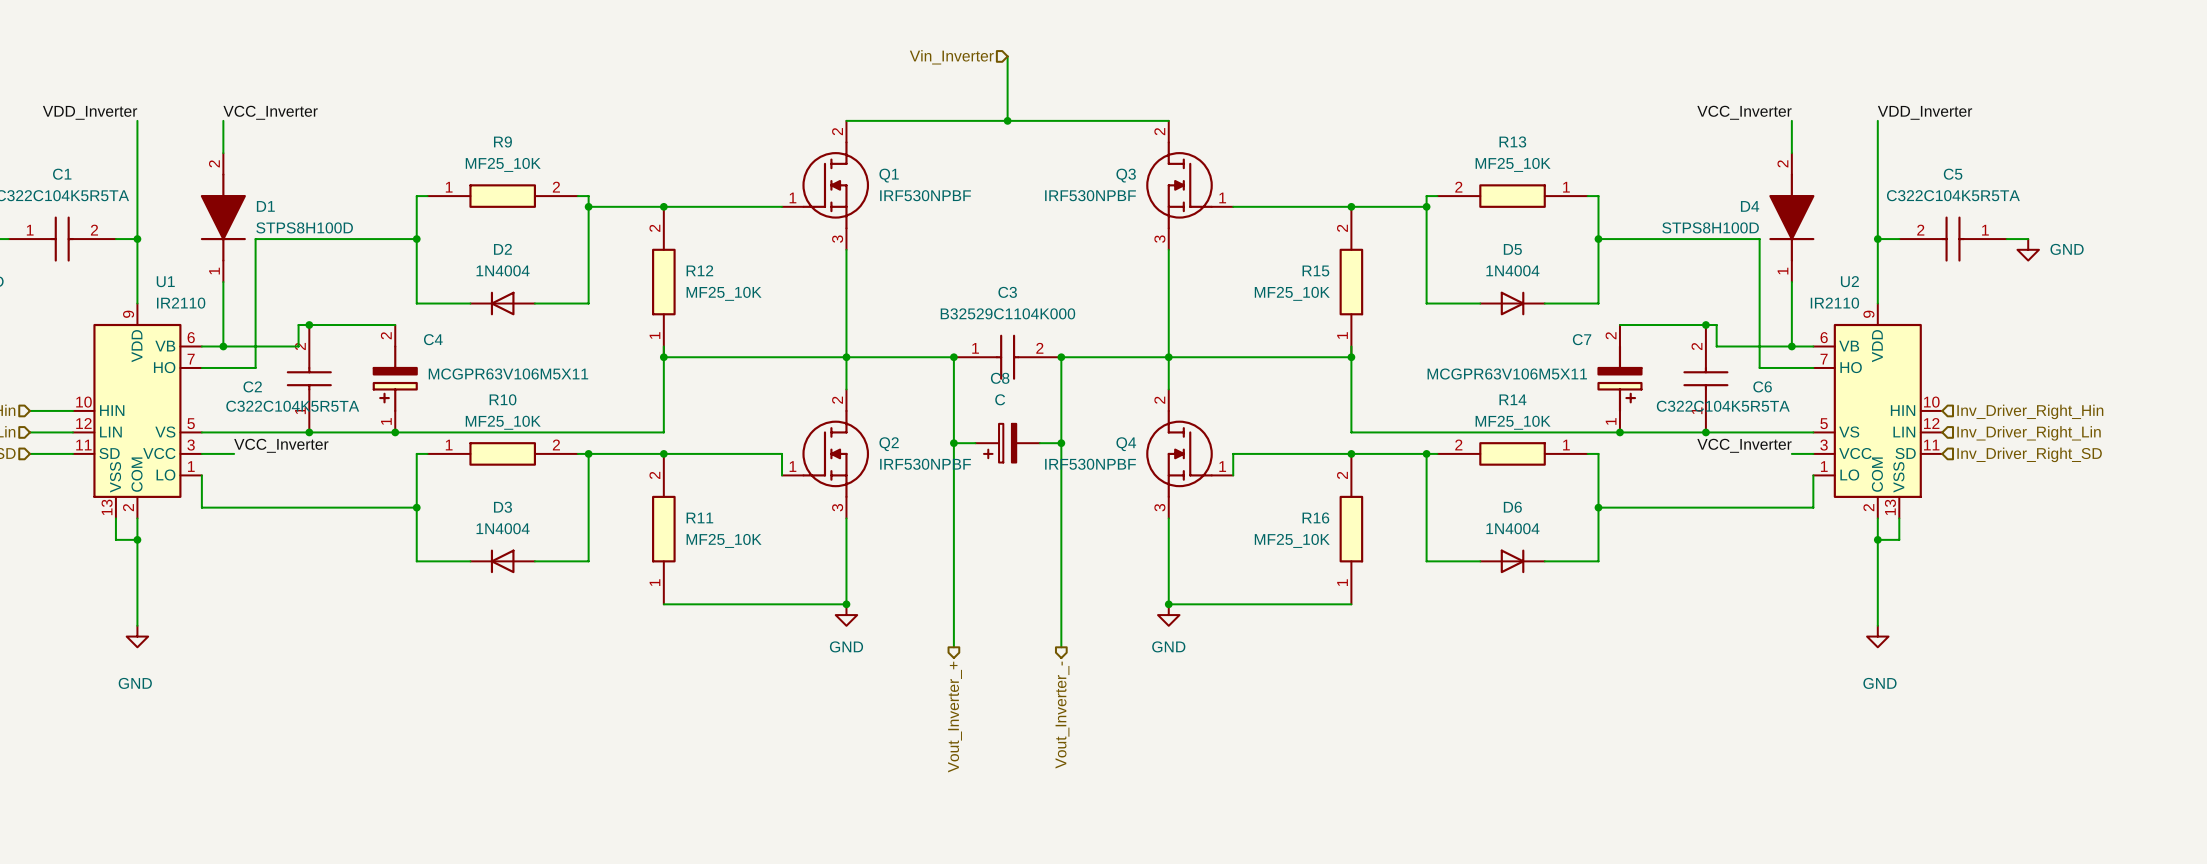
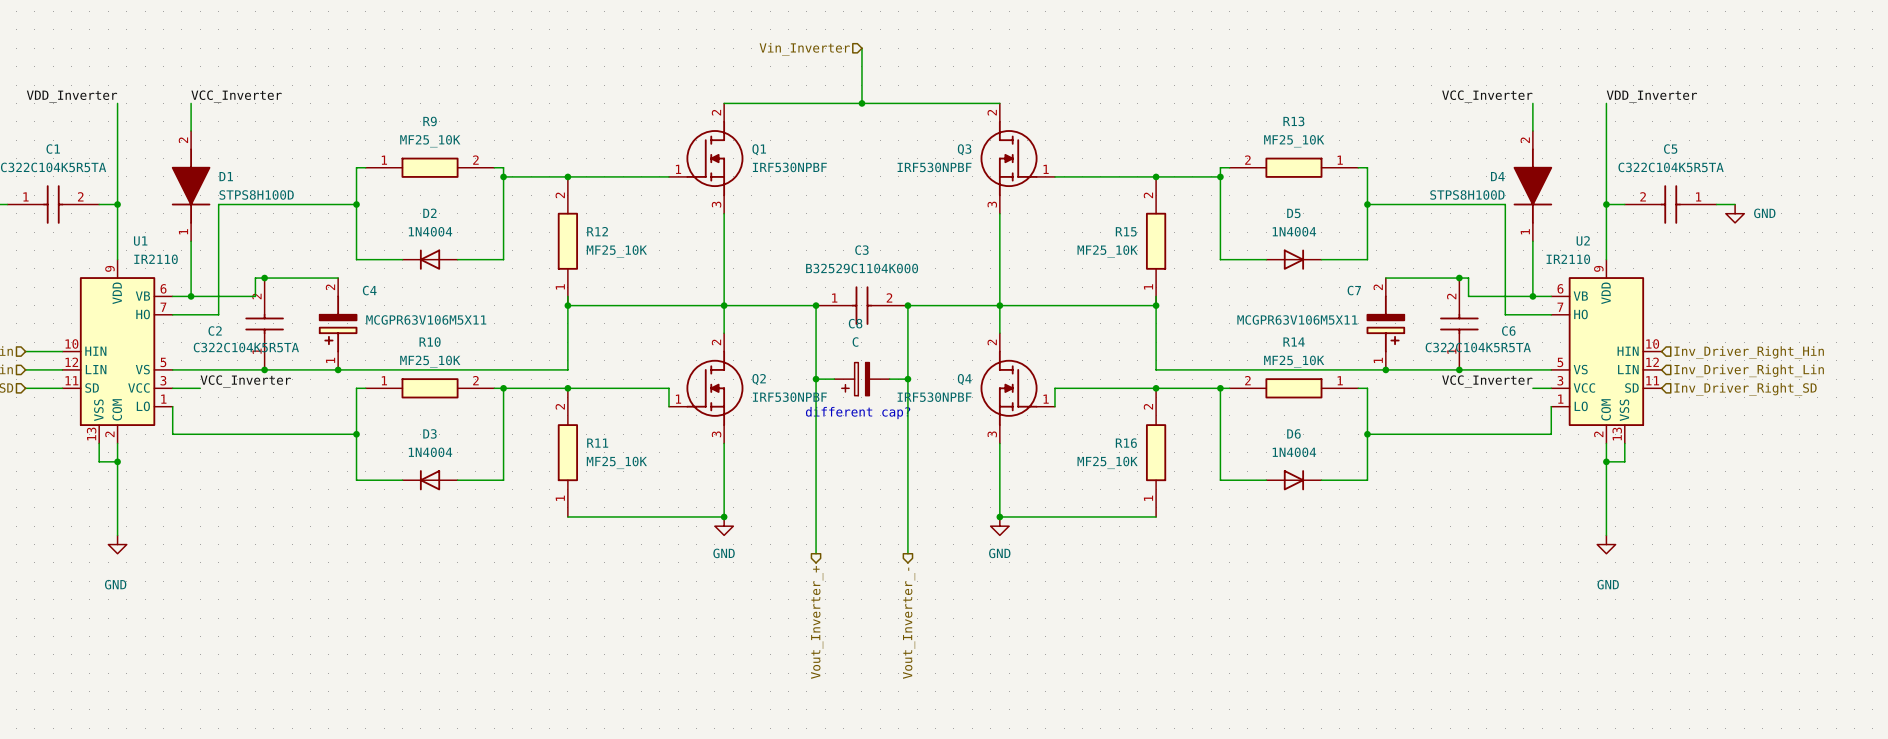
text: none -> different cap? (858, 413)

